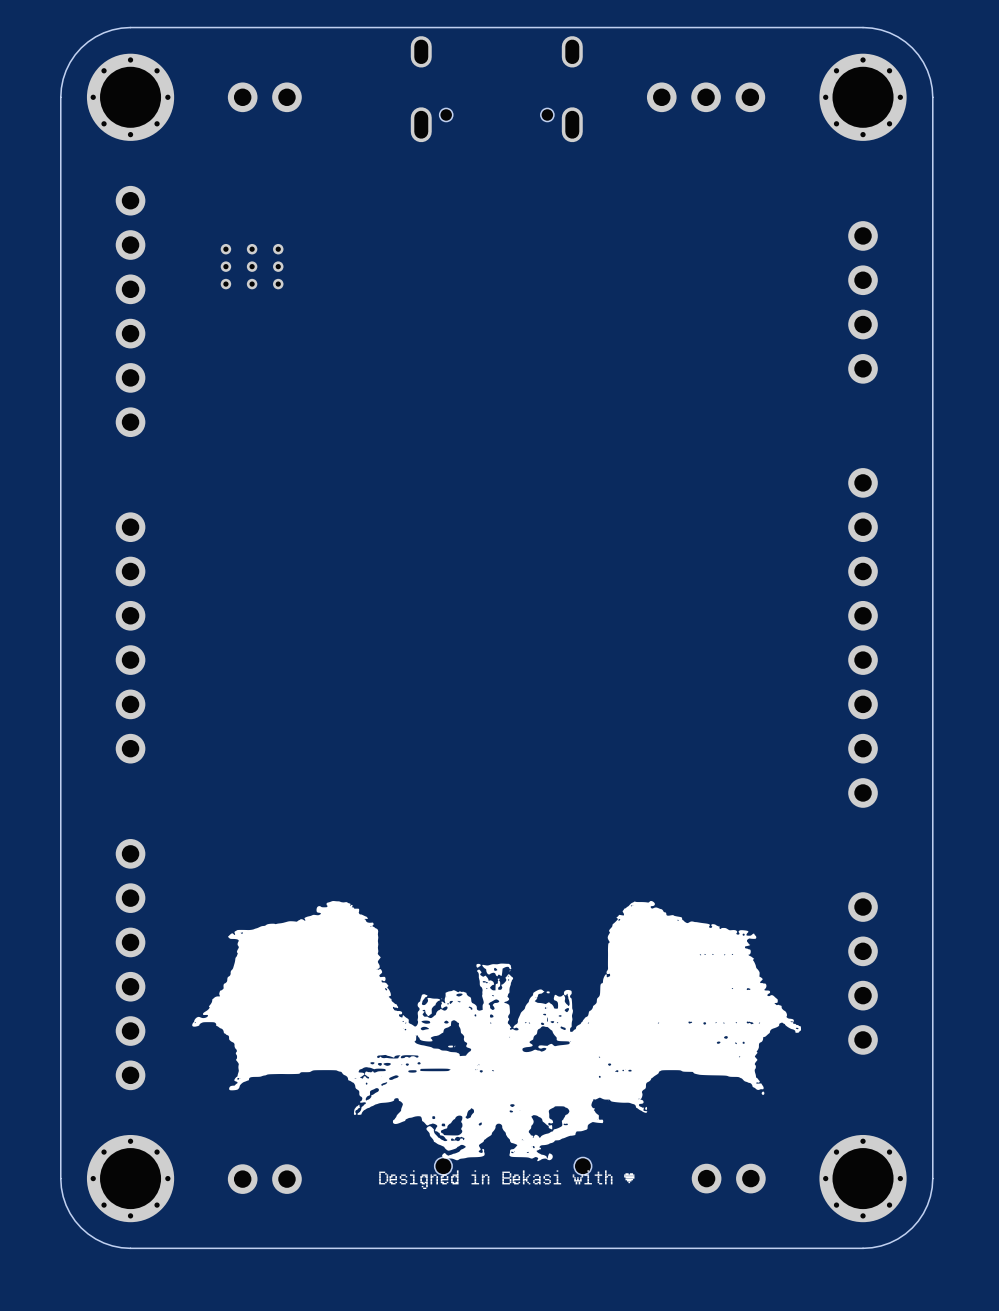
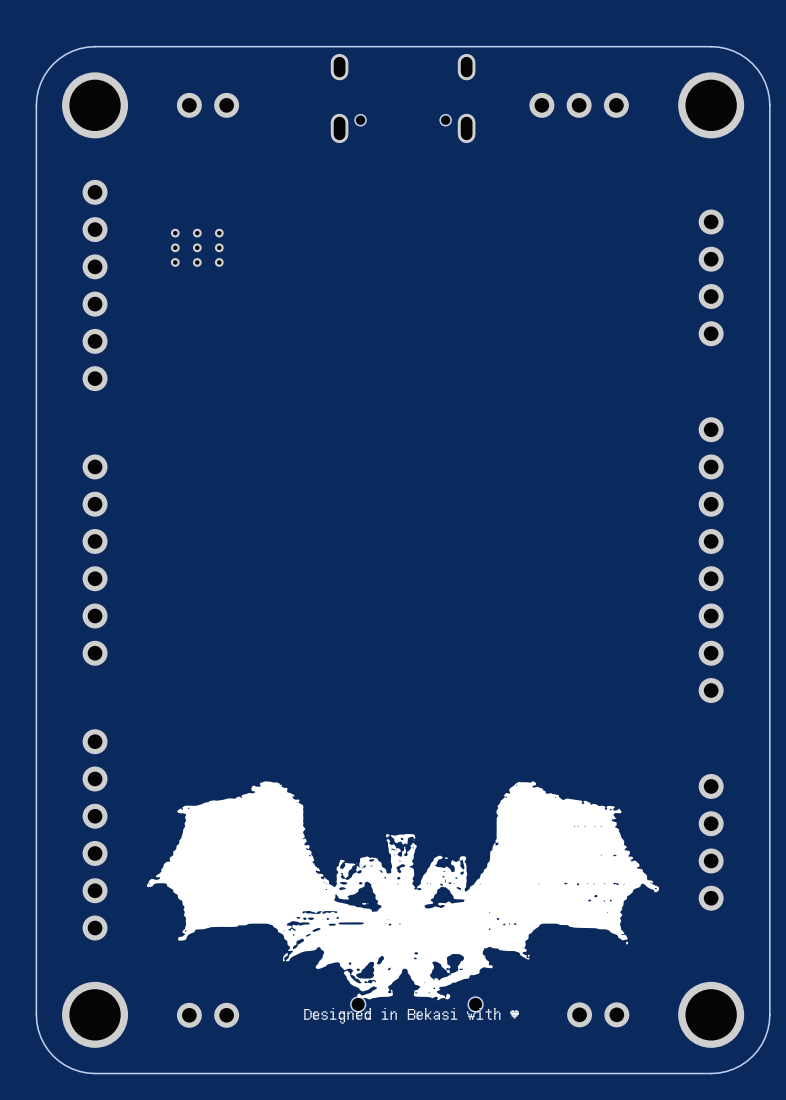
part footprint: [86, 53, 175, 141] -> [62, 72, 129, 139]
part footprint: [819, 53, 907, 141] -> [678, 72, 745, 139]
part footprint: [86, 1134, 175, 1223] -> [62, 981, 129, 1048]
part footprint: [819, 1134, 907, 1223] -> [678, 981, 745, 1048]

